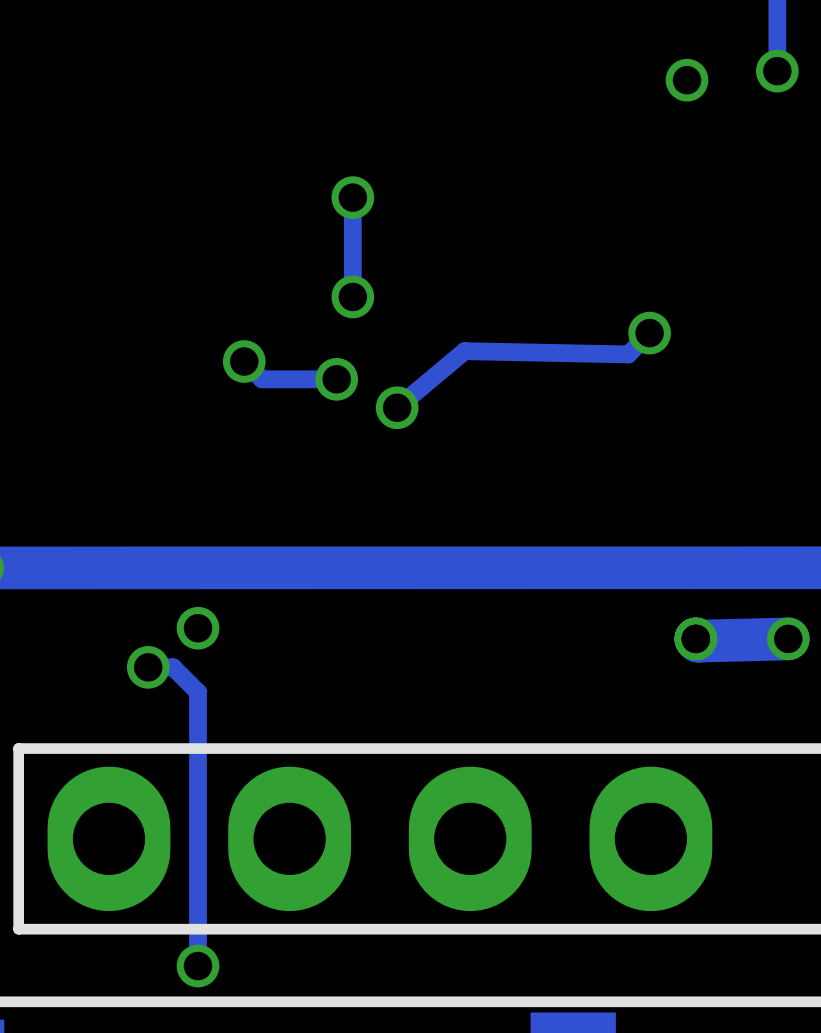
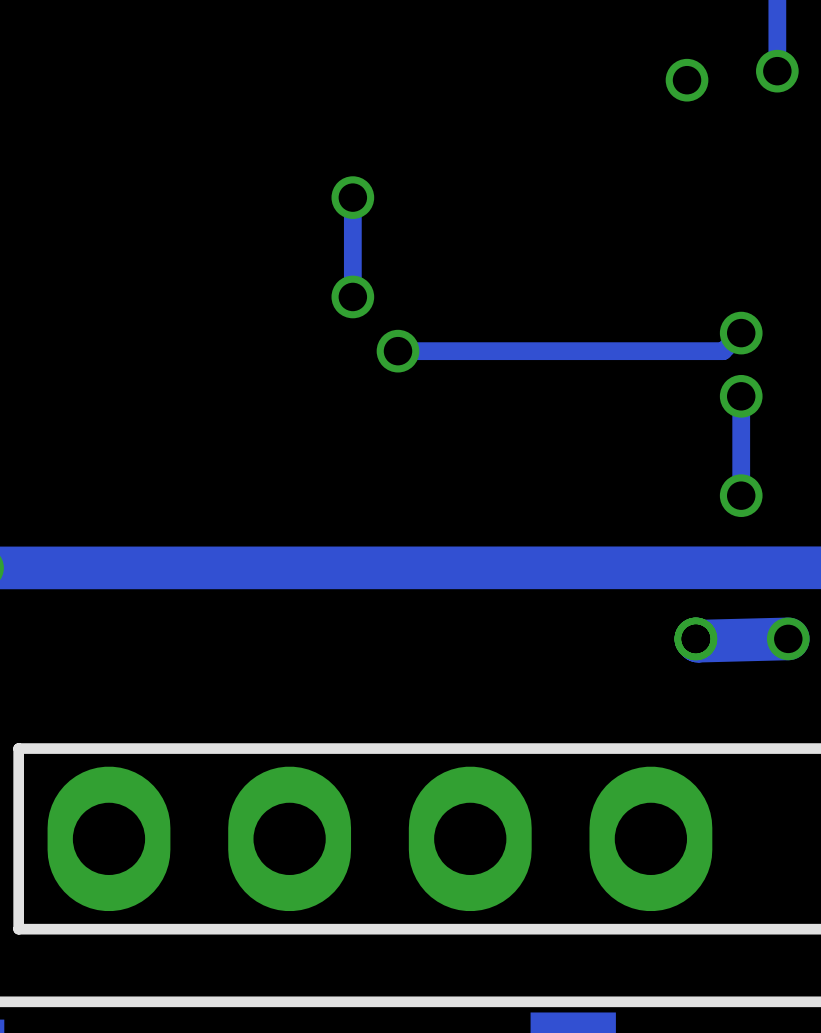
track: (649, 333) (628, 354) (464, 351) (397, 407) -> none
via: (649, 333) -> none
track: none -> (741, 333) (723, 351) (398, 351)
via: none -> (741, 333)
via: none -> (398, 351)
track: (244, 361) (262, 379) (336, 379) -> none
via: (244, 361) -> none
via: (336, 379) -> none
track: none -> (741, 396) (741, 495)
via: none -> (741, 396)
via: (397, 407) -> none
via: none -> (741, 495)
via: (198, 628) -> none
track: (148, 667) (173, 667) (198, 692) (198, 966) -> none
via: (148, 667) -> none
via: (198, 966) -> none

